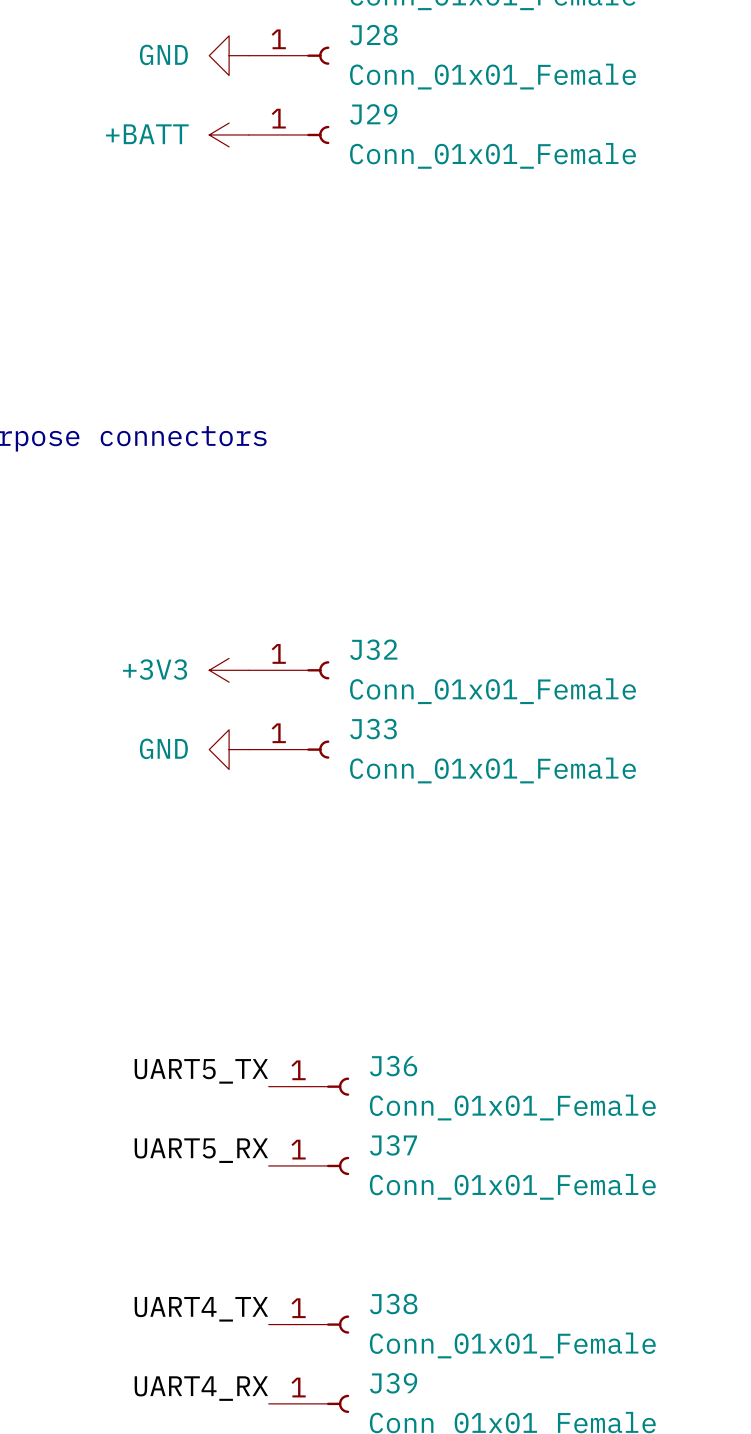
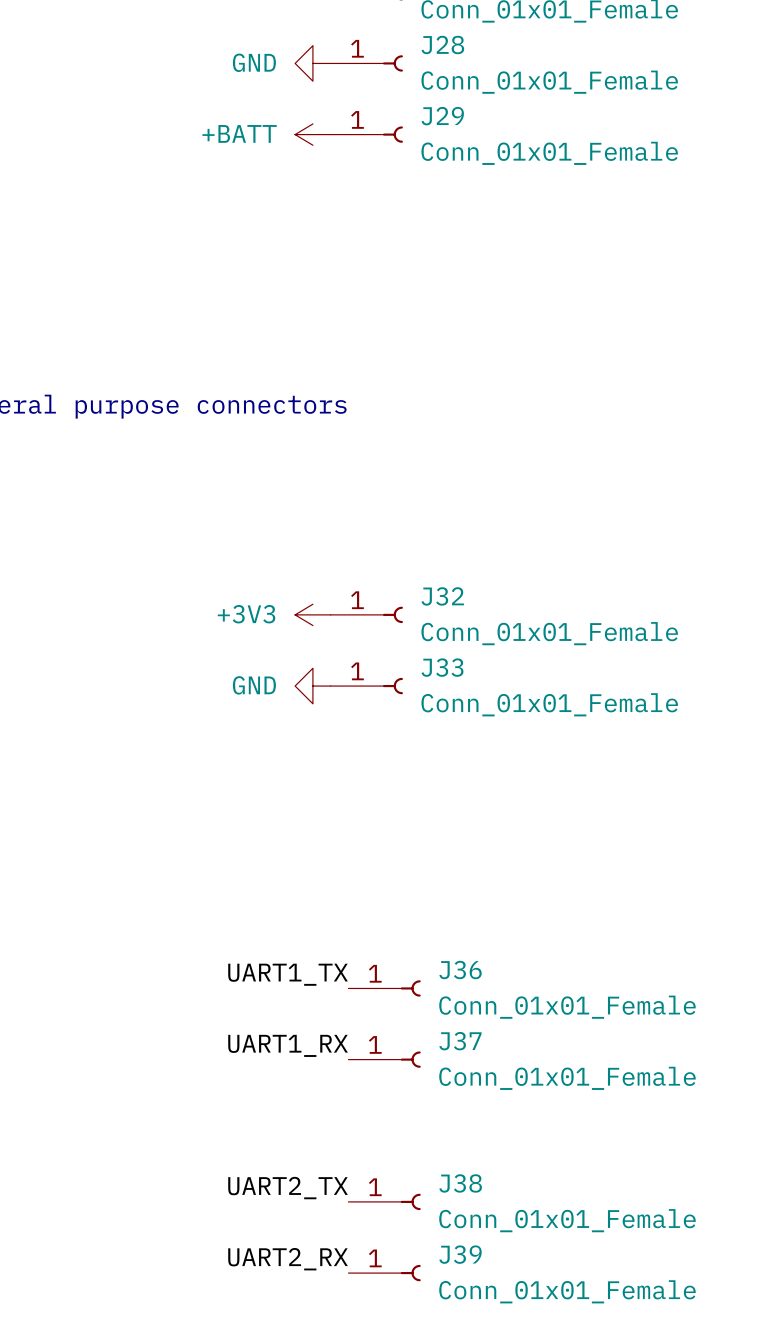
label: UART5_TX (201, 1071) -> UART1_TX (288, 974)
label: UART5_RX (201, 1150) -> UART1_RX (288, 1045)
label: UART4_TX (201, 1309) -> UART2_TX (288, 1188)
label: UART4_RX (201, 1388) -> UART2_RX (288, 1259)

